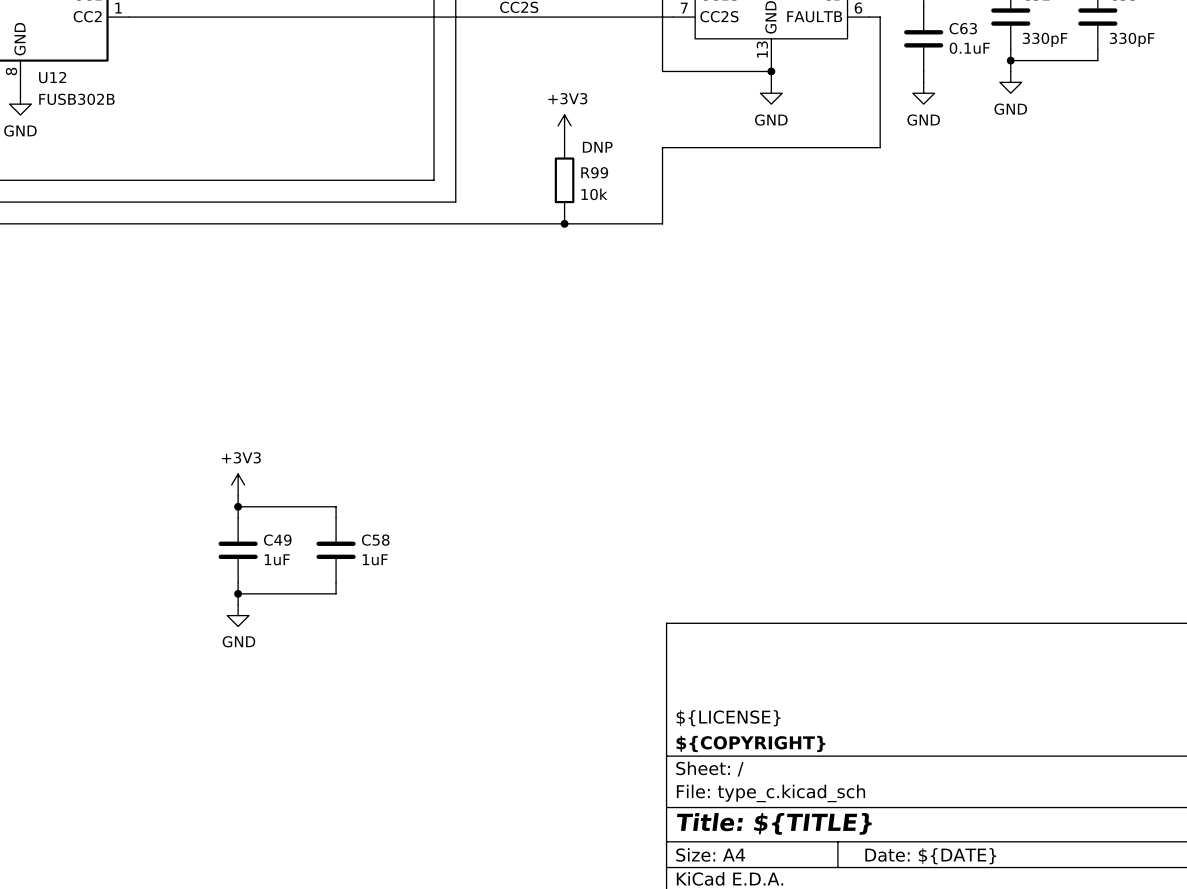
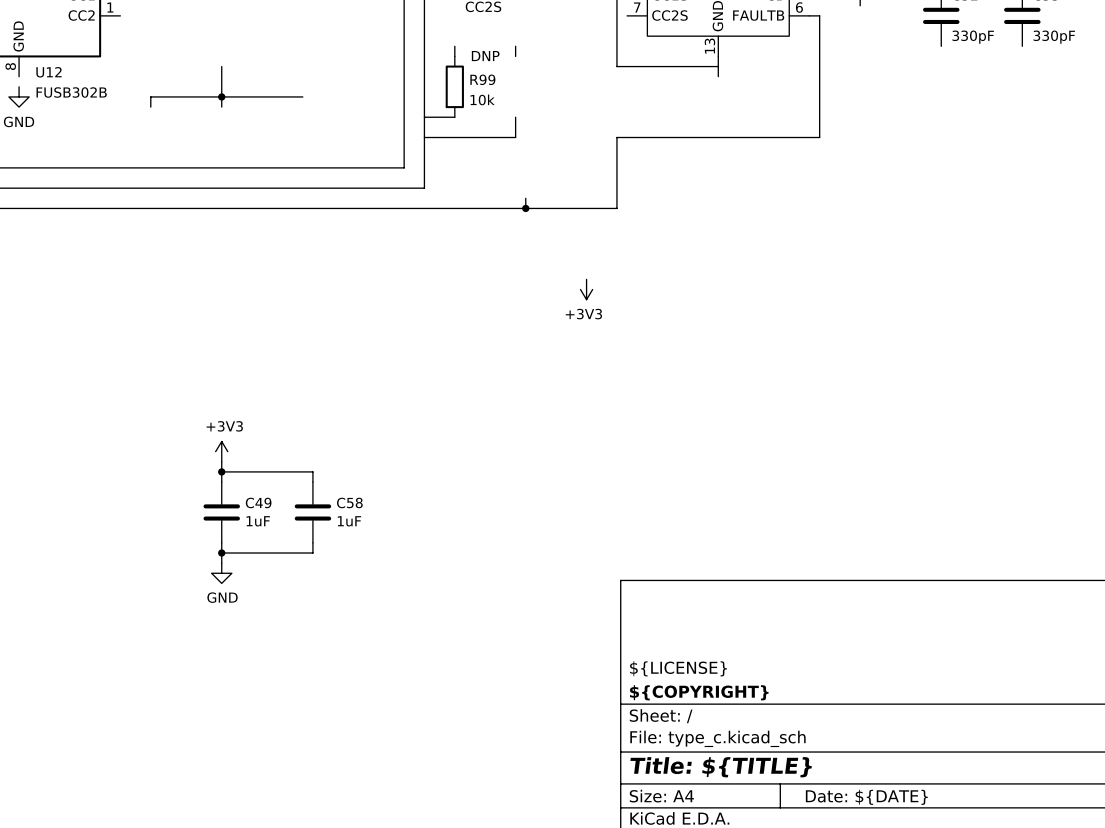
wire: (129, 17) (673, 17) -> none
C63: 0.1uF (923, 38) -> none
wire: none -> (454, 46) (454, 56)
wire: (1010, 49) (1010, 71) -> none
wire: (1097, 49) (1097, 60) (1010, 60) -> none
junction: (1010, 60) -> none
wire: none -> (221, 66) (221, 107)
junction: (771, 71) -> none
wire: (923, 71) (923, 82) -> none
wire: (20, 82) (20, 93) -> none
power symbol: GND (1010, 82) -> none
power symbol: GND (771, 93) -> none
power symbol: GND (923, 93) -> none
junction: none -> (221, 96)
wire: none -> (302, 96) (150, 96) (150, 107)
wire: none -> (424, 117) (454, 117)
wire: none -> (515, 117) (515, 137) (424, 137)
power symbol rotation: 0° (564, 125) -> 180° (586, 289)
power symbol position: +3V3 (564, 125) -> +3V3 (586, 289)
wire: (564, 136) (564, 147) -> (515, 46) (515, 56)
R99 position: (564, 180) -> (454, 86)

